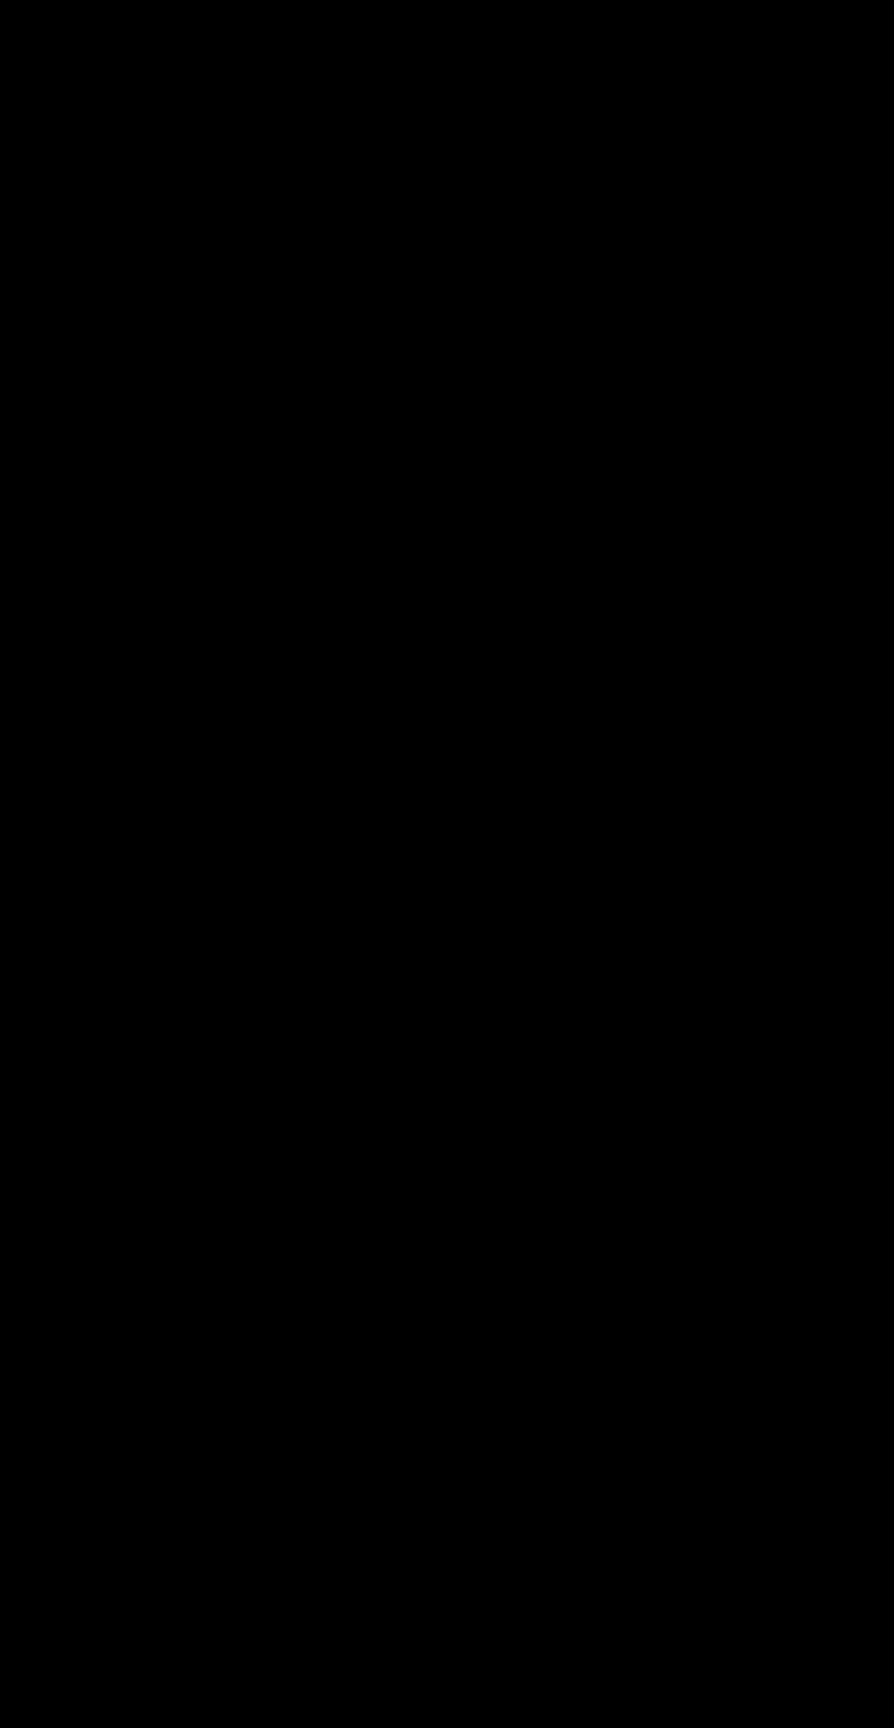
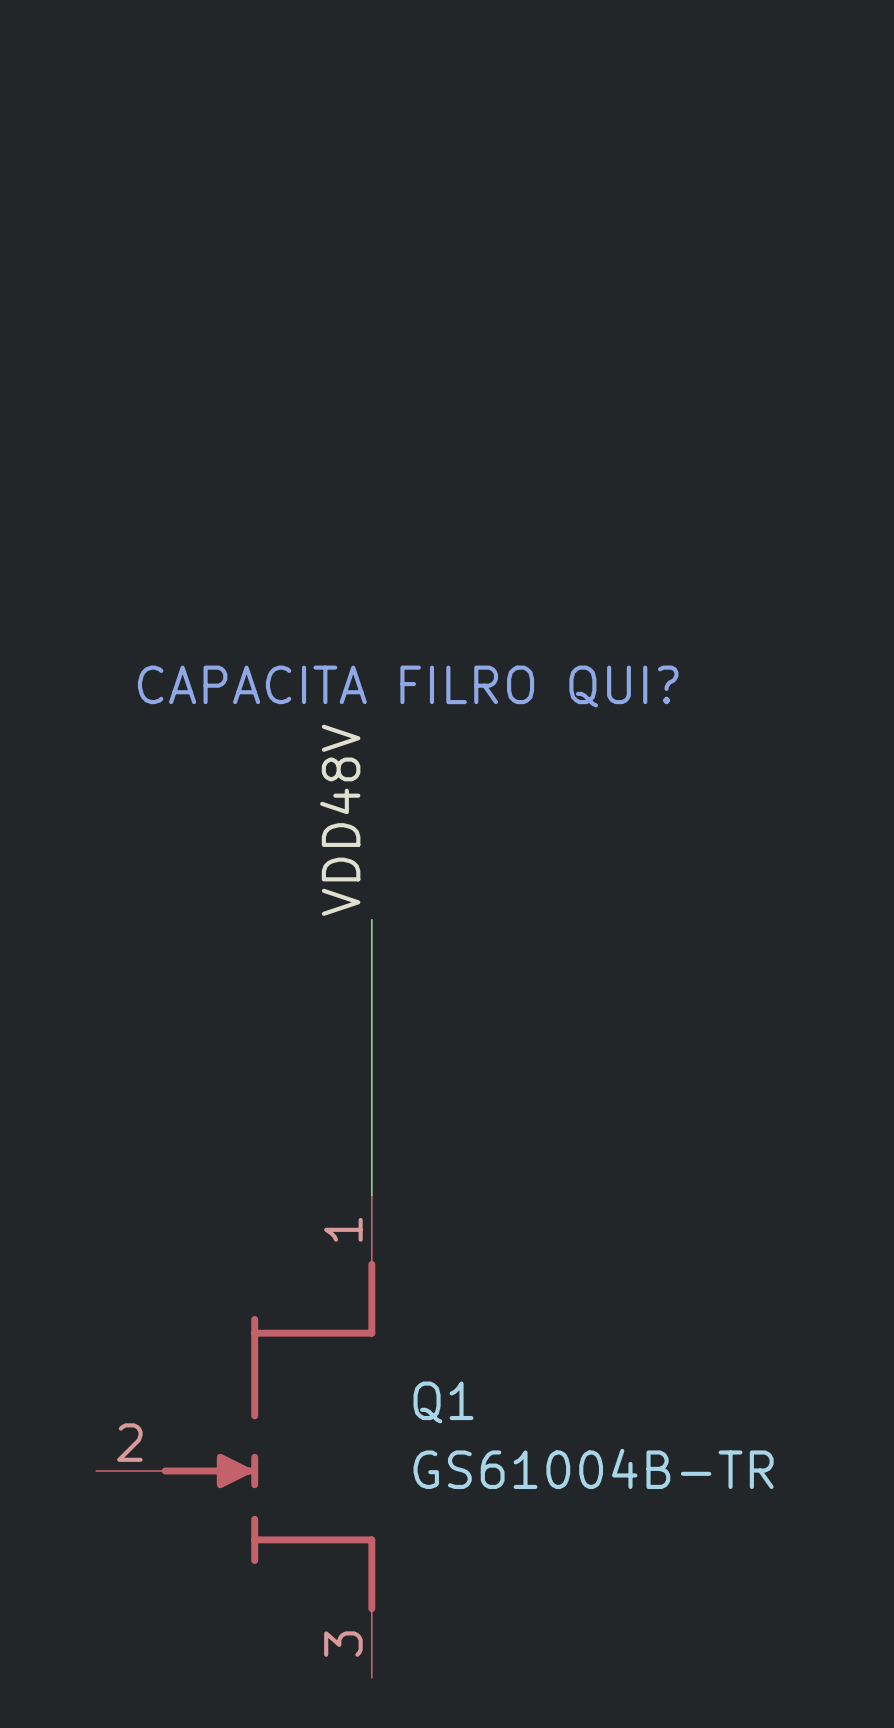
text: none -> CAPACITA FILRO QUI? (408, 686)
label: none -> VDD48V (340, 820)
wire: none -> (371, 919) (371, 1195)
Q1: none -> GS61004B-TR (235, 1436)

